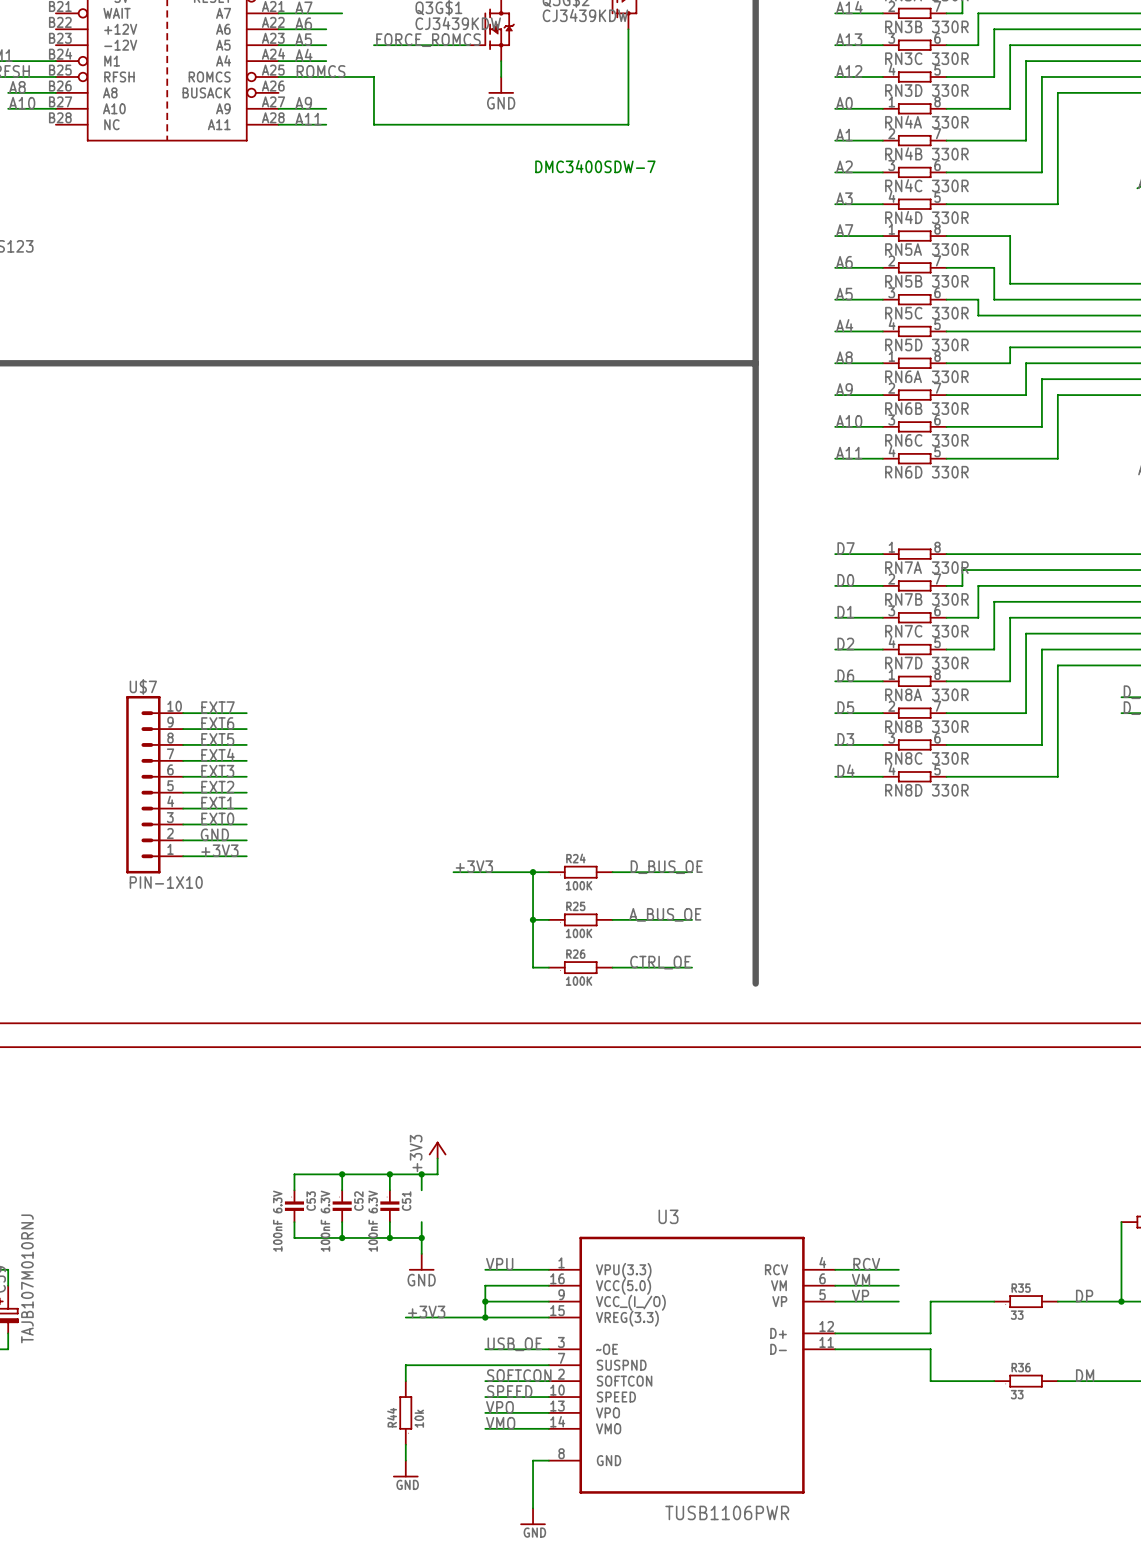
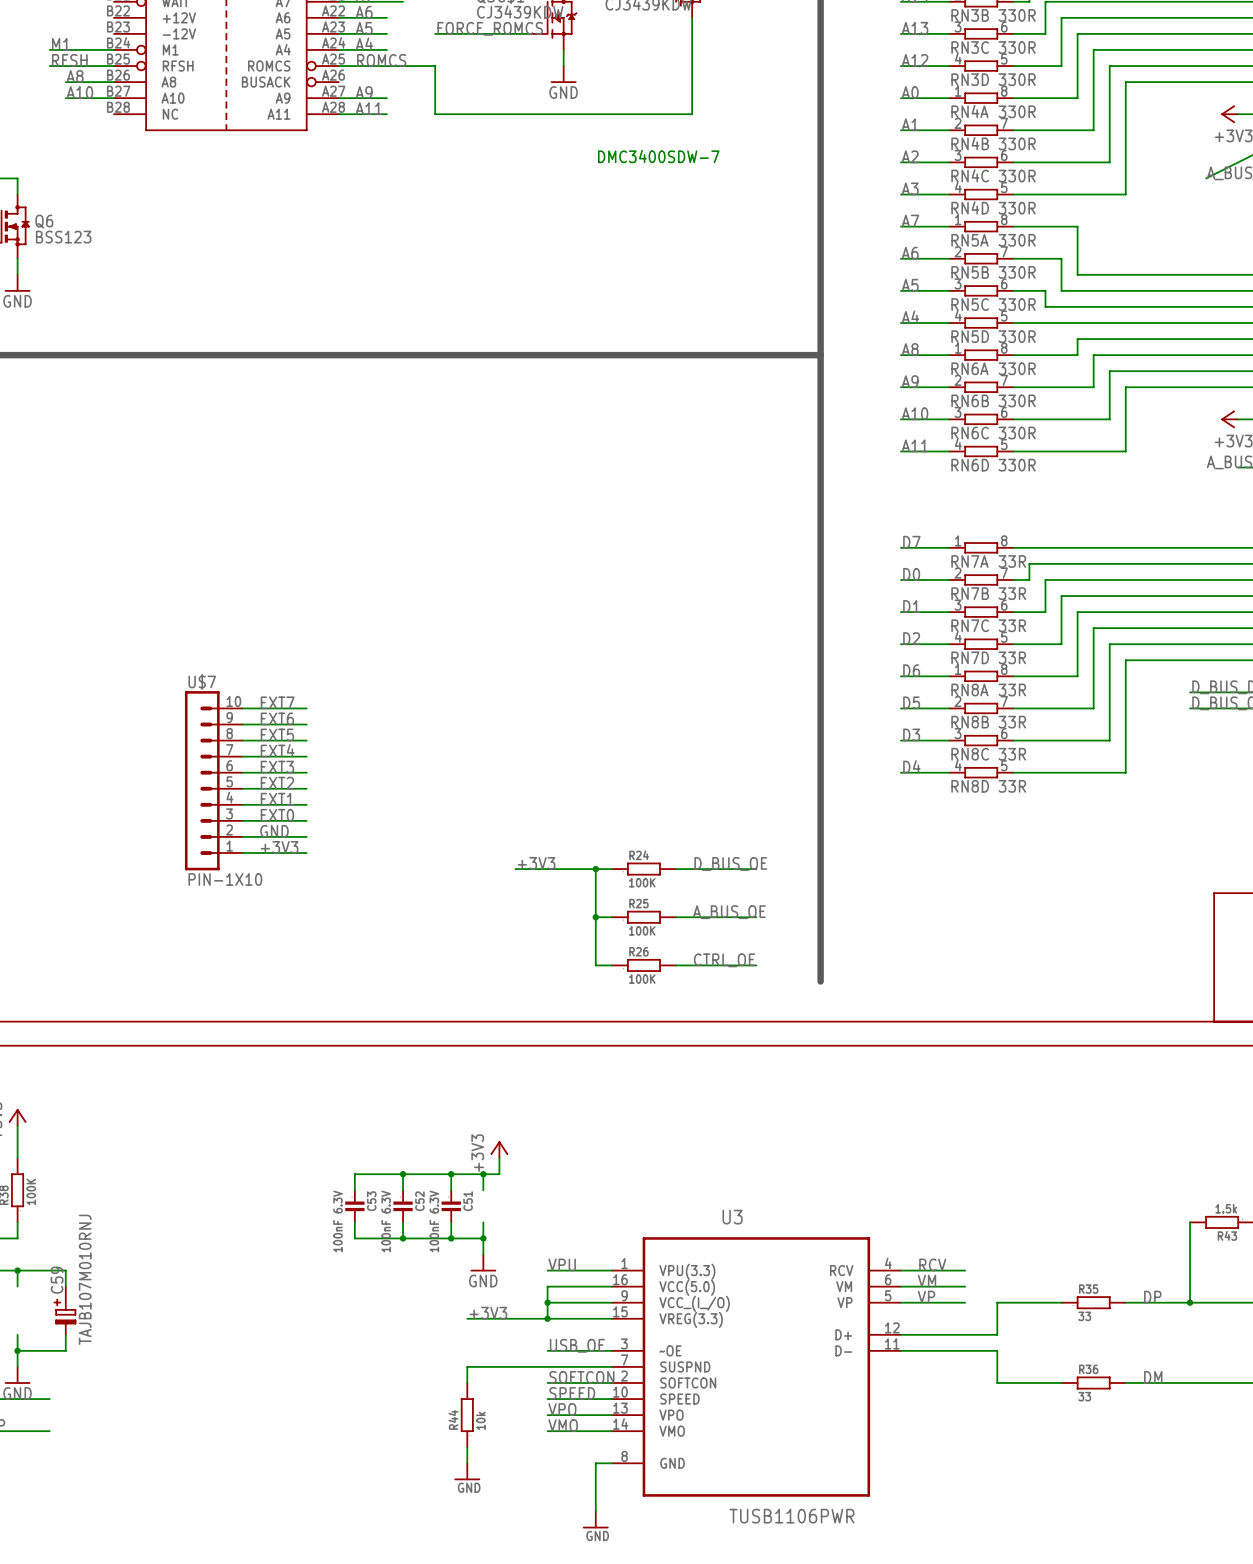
RN7A value: 330R (950, 567) -> 33R (1012, 561)
RN7B value: 330R (950, 599) -> 33R (1012, 593)
RN7C value: 330R (950, 631) -> 33R (1012, 625)
RN7D value: 330R (950, 663) -> 33R (1012, 657)
RN8A value: 330R (950, 694) -> 33R (1012, 689)
RN8B value: 330R (950, 726) -> 33R (1012, 722)
RN8C value: 330R (950, 758) -> 33R (1012, 754)
RN8D value: 330R (950, 790) -> 33R (1012, 786)

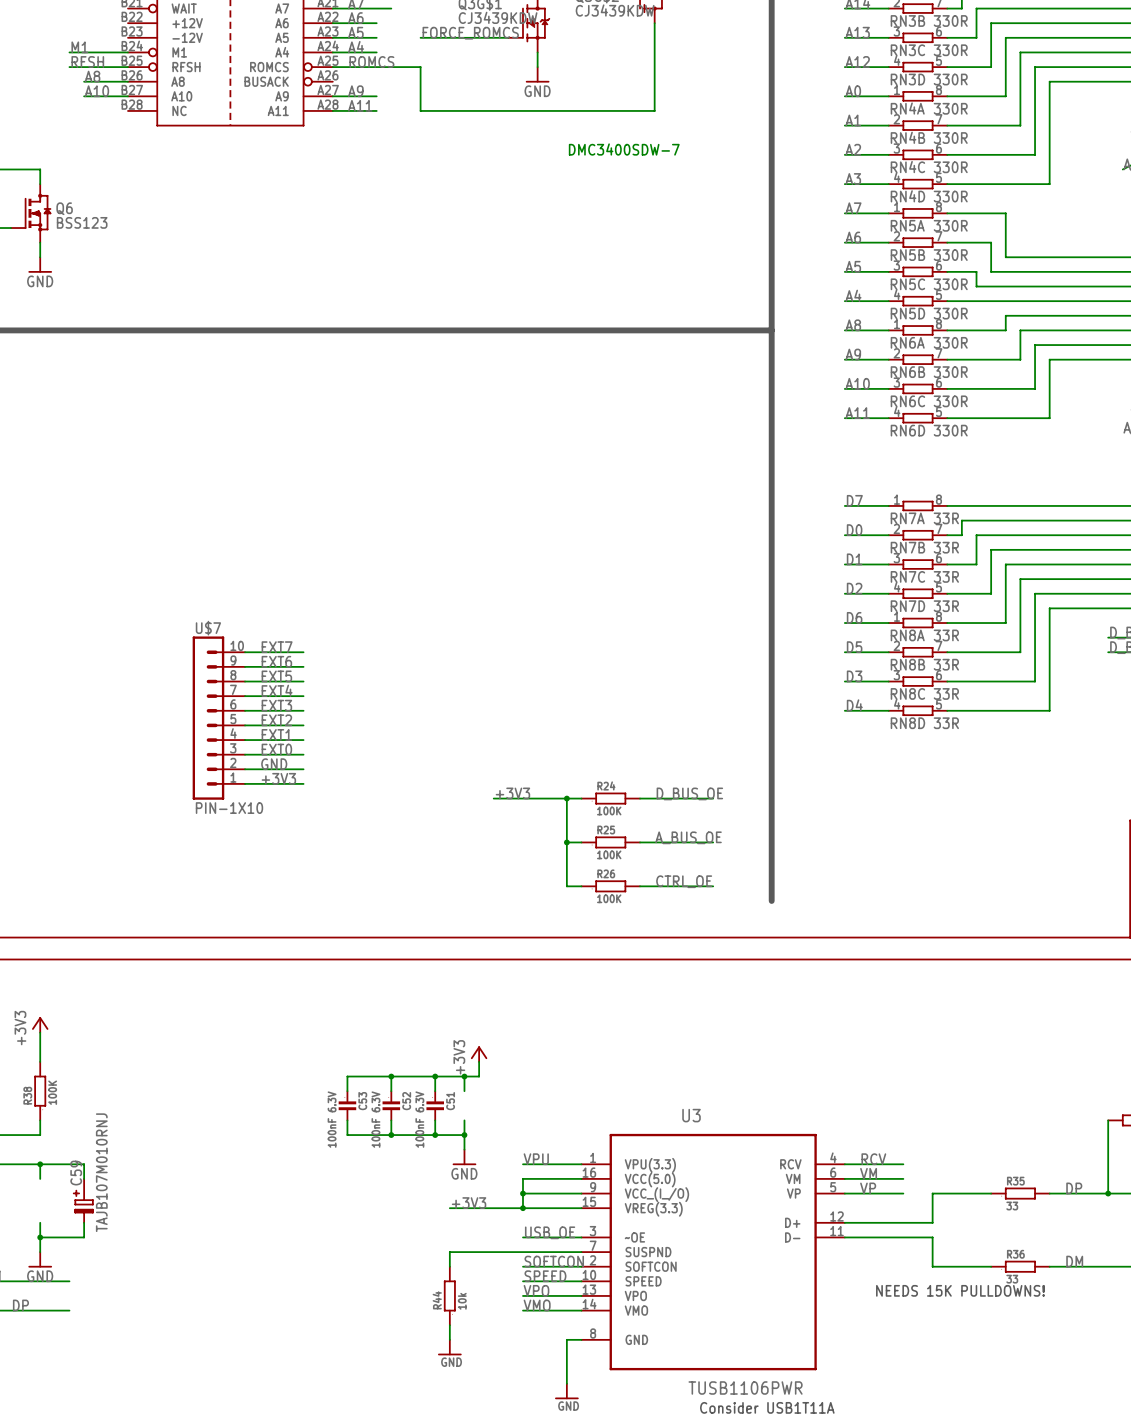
text: none -> NEEDS 15K PULLDOWNS! (960, 1290)
text: none -> Consider USB1T11A (767, 1407)

